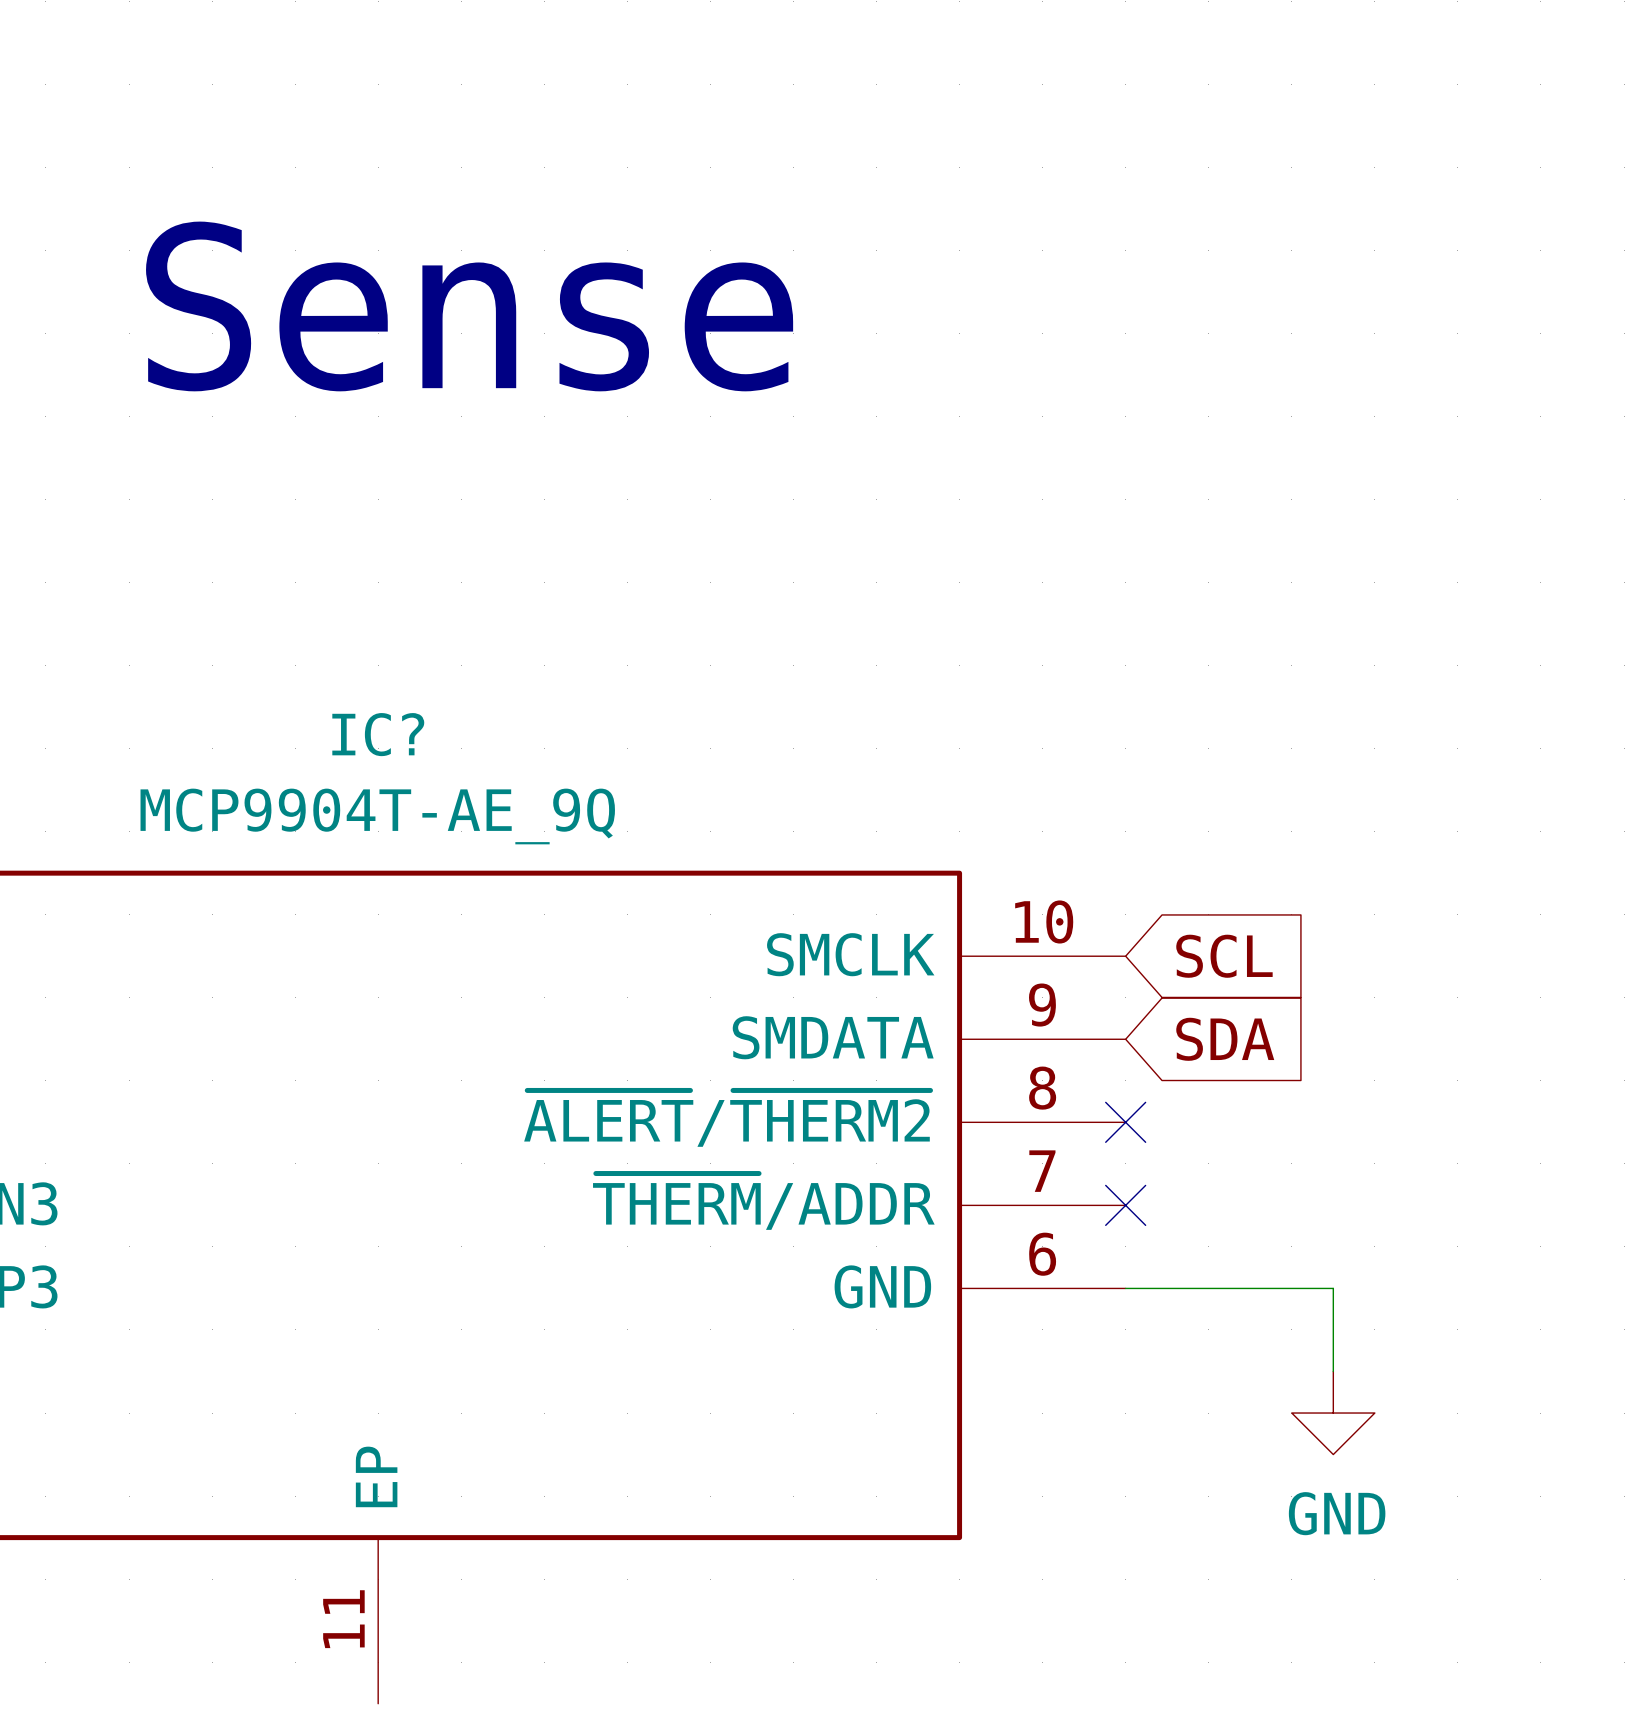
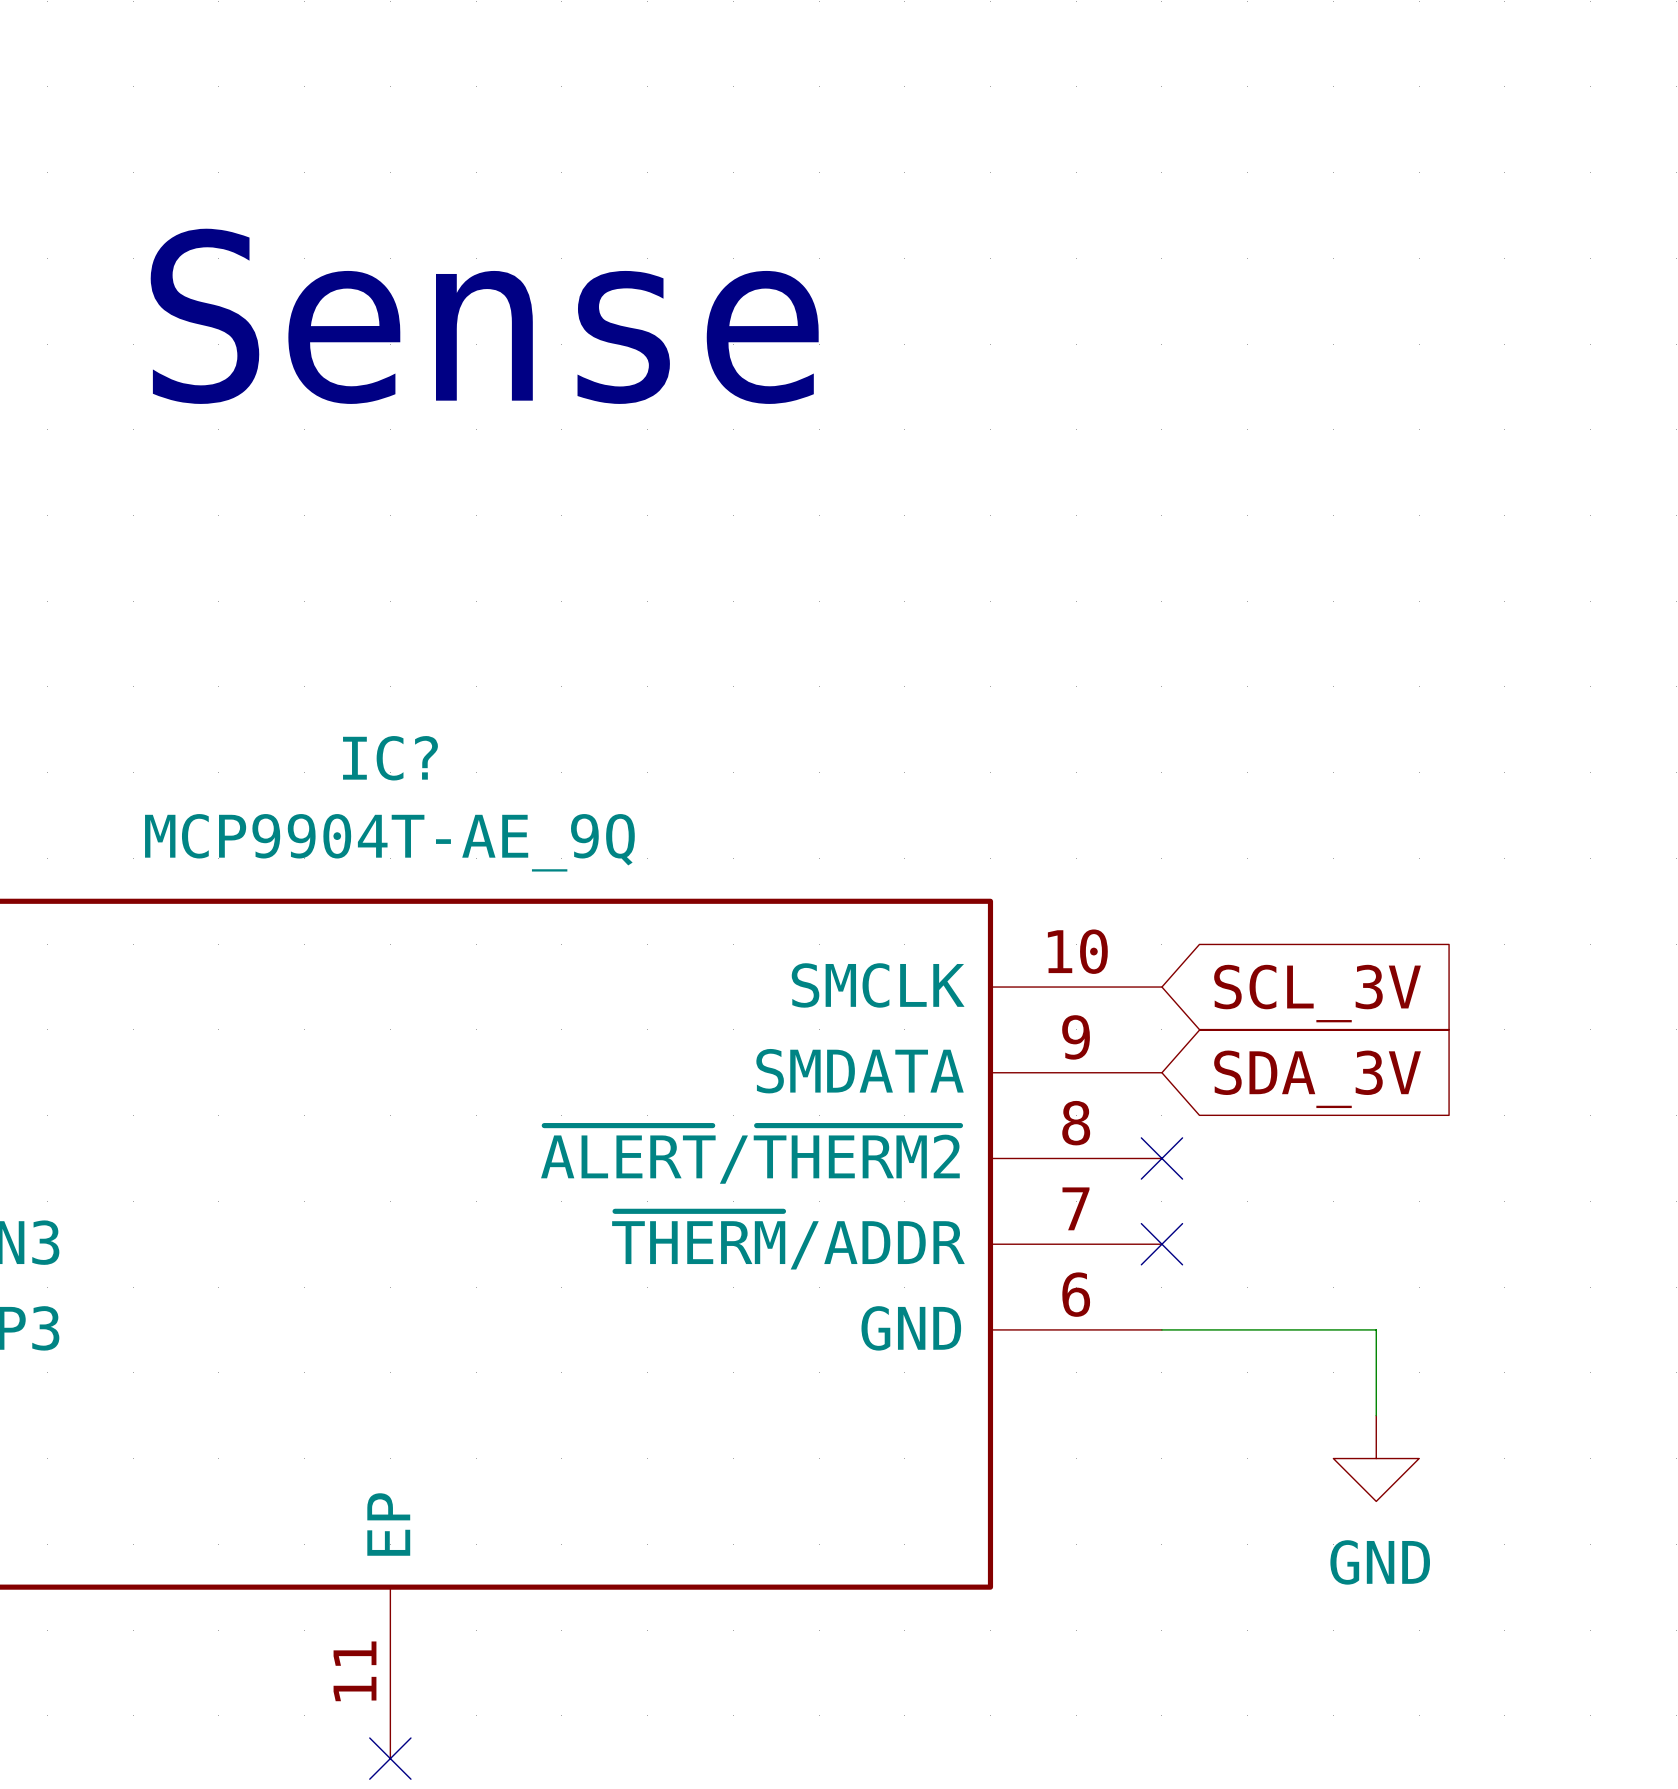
global label: SCL (1224, 956) -> SCL_3V (1317, 993)
global label: SDA (1225, 1039) -> SDA_3V (1317, 1079)
no-connect mark: none -> (390, 1758)

